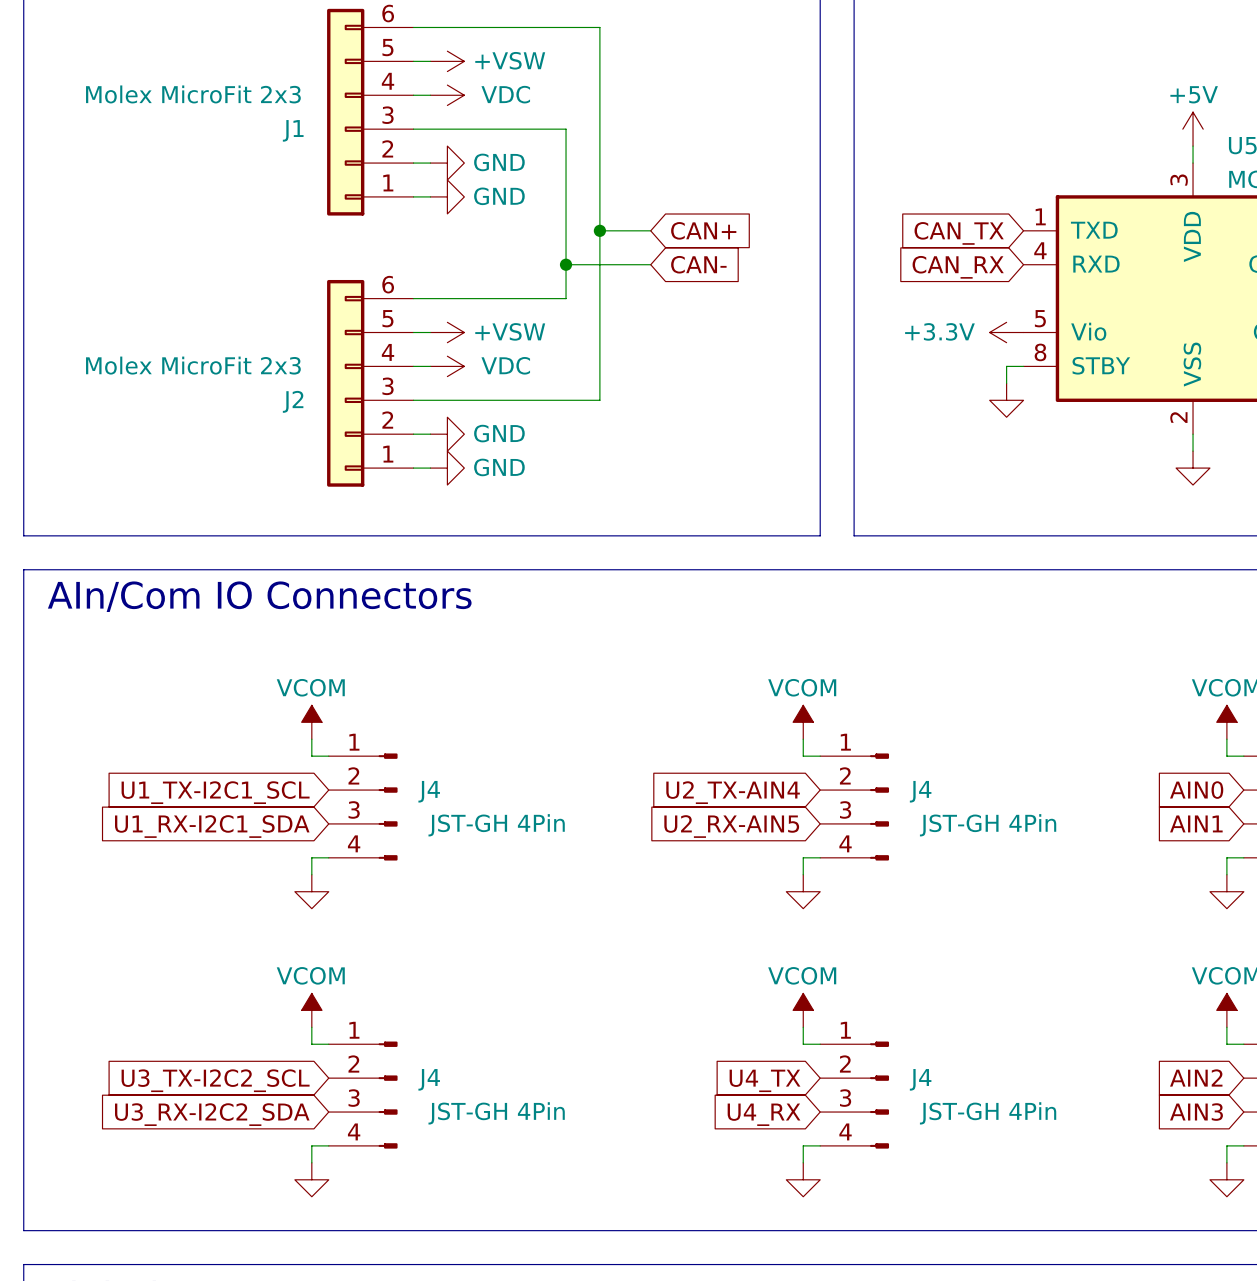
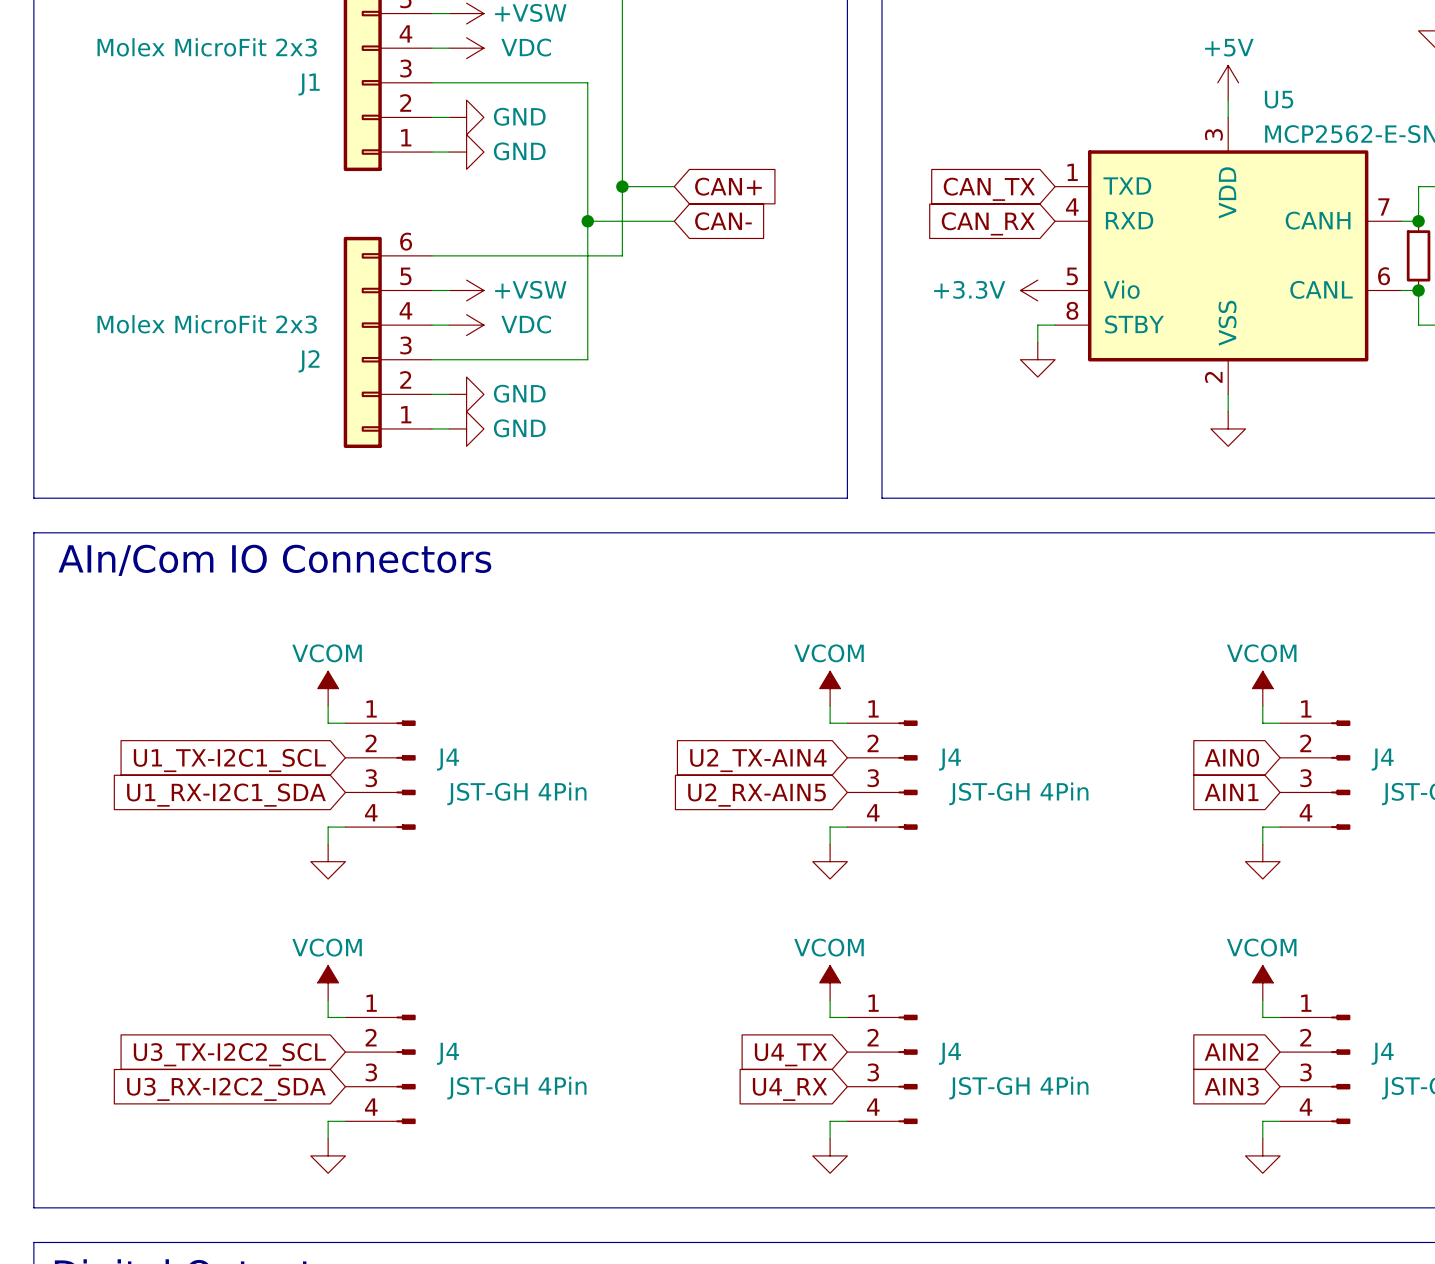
wire: (599, 298) (599, 400) (566, 400) -> (622, 255) (587, 255) (587, 359)

